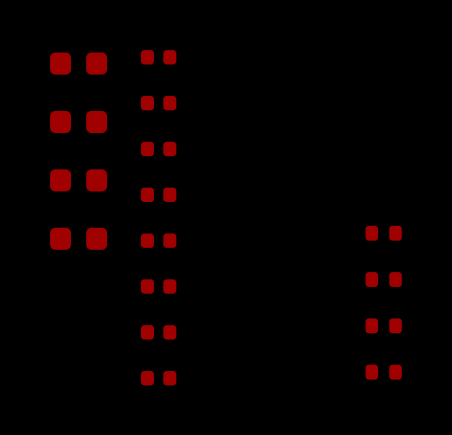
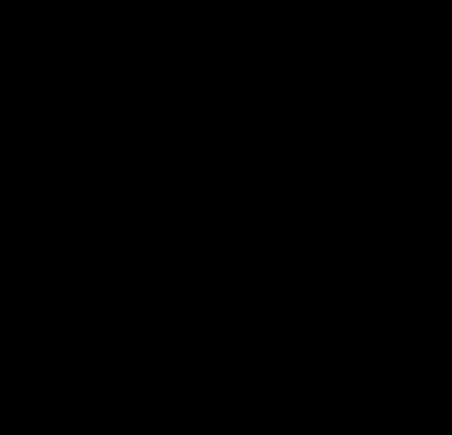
part: (158, 57) -> none
part: (78, 63) -> none
part: (158, 103) -> none
part: (78, 121) -> none
part: (158, 148) -> none
part: (78, 180) -> none
part: (158, 194) -> none
part: (383, 233) -> none
part: (78, 238) -> none
part: (158, 240) -> none
part: (383, 279) -> none
part: (158, 286) -> none
part: (383, 325) -> none
part: (158, 332) -> none
part: (383, 372) -> none
part: (158, 378) -> none

